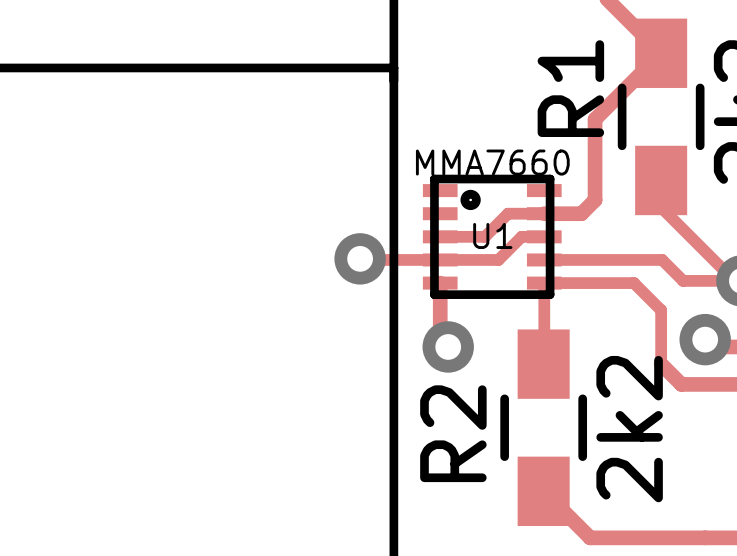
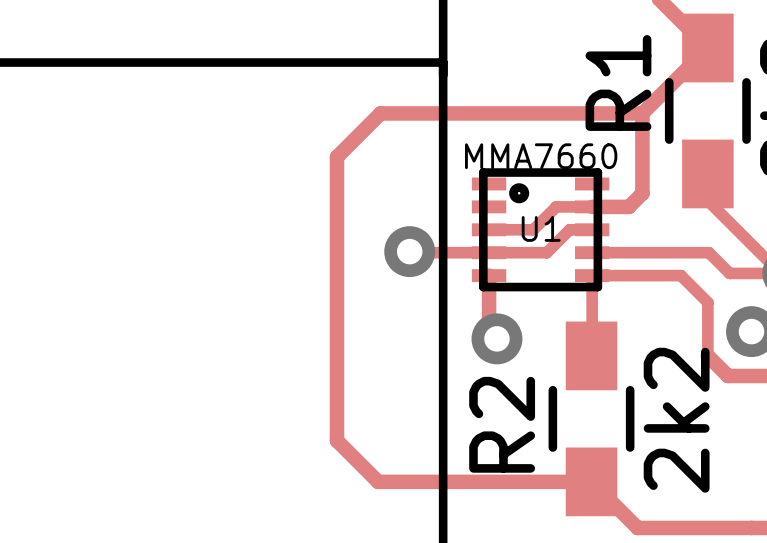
track: none -> (642, 113) (380, 113) (336, 157) (336, 440) (378, 481) (591, 481)

